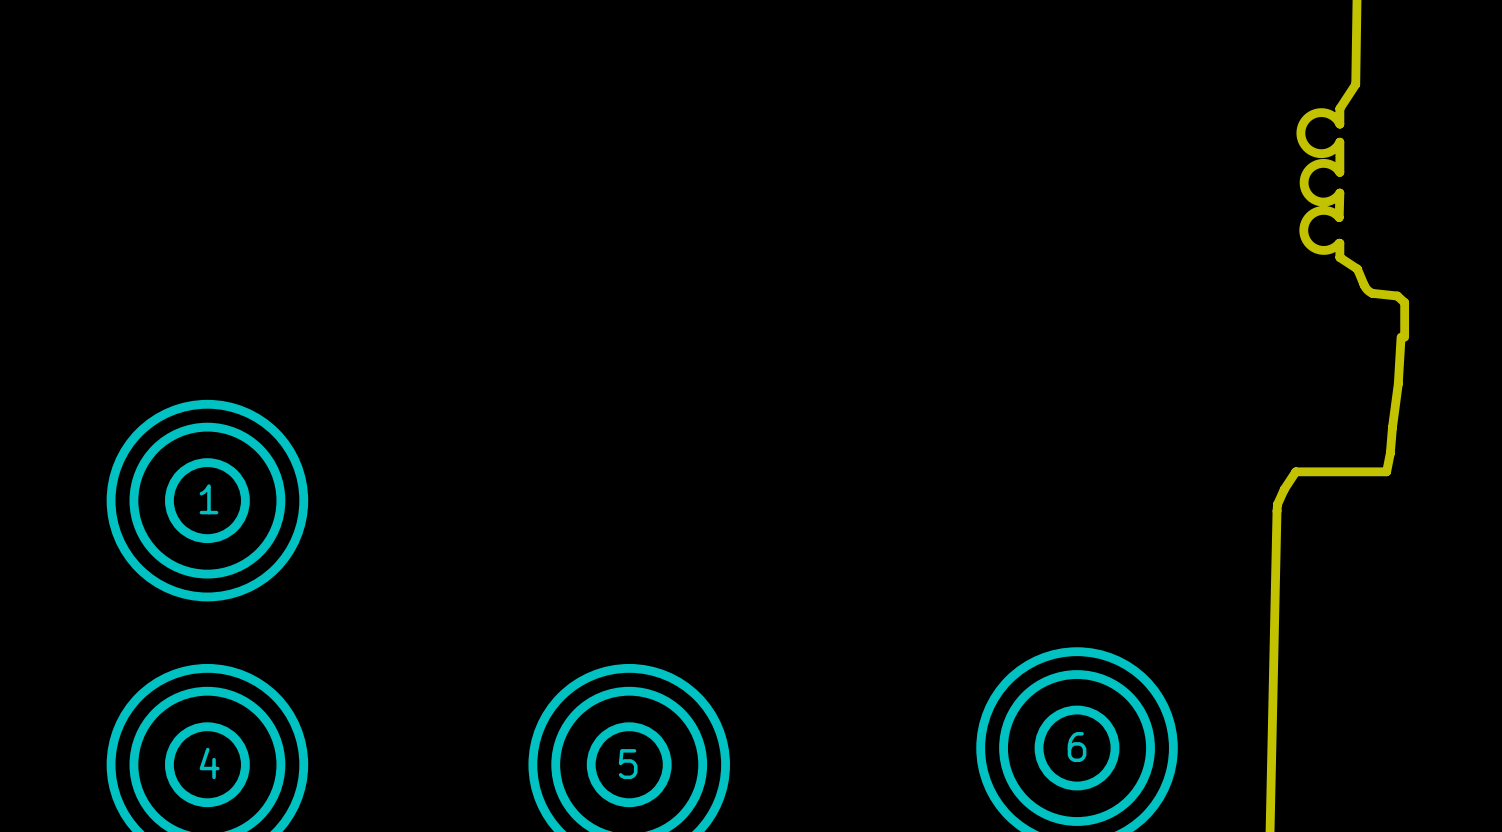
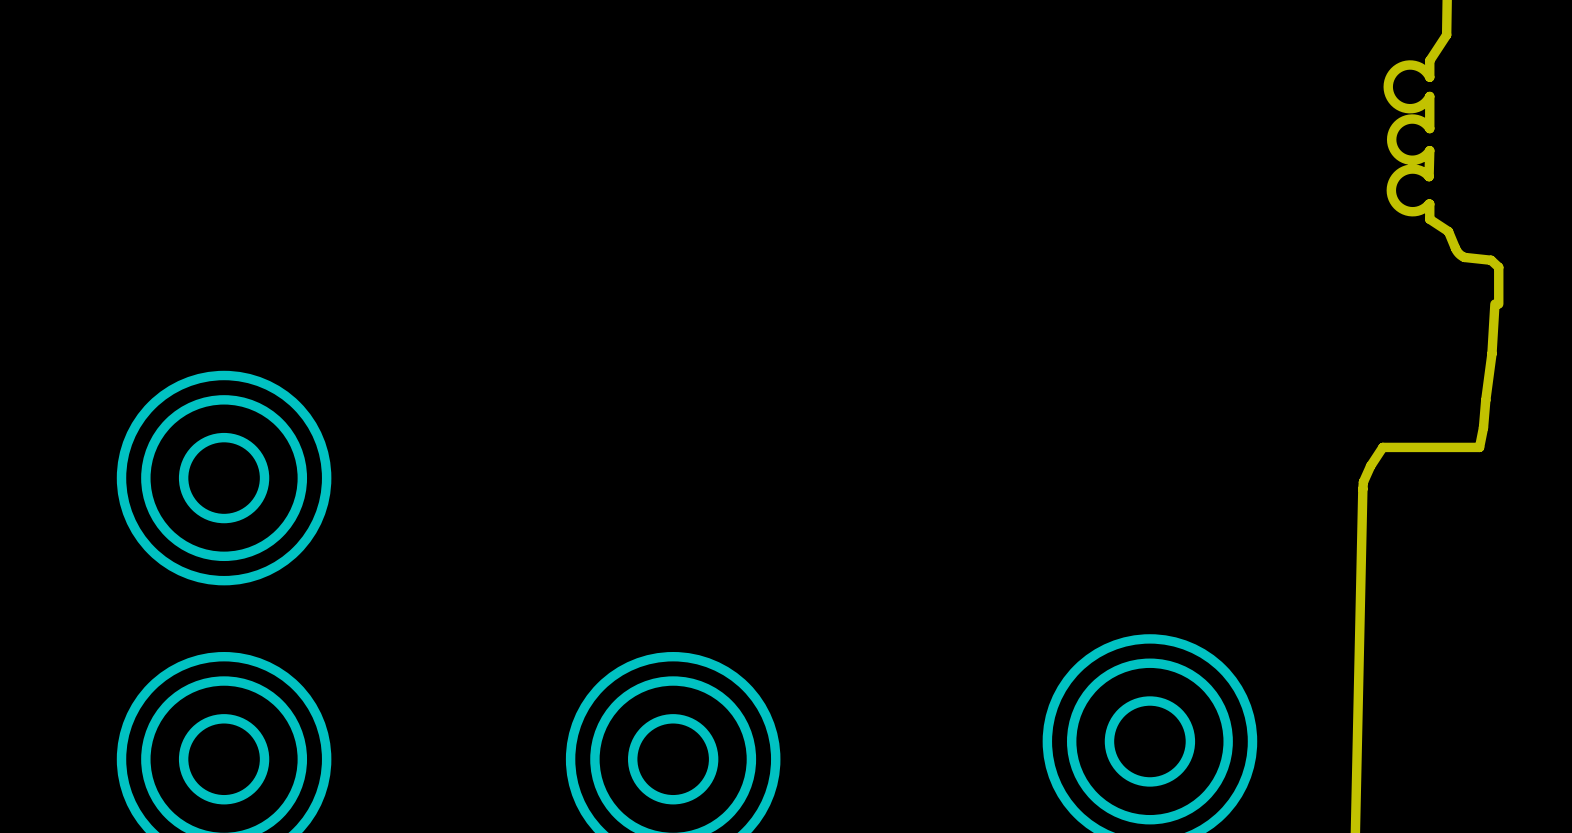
text: 1 (208, 499) -> none
text: 6 (1077, 747) -> none
text: 4 (209, 763) -> none
text: 5 (628, 764) -> none

